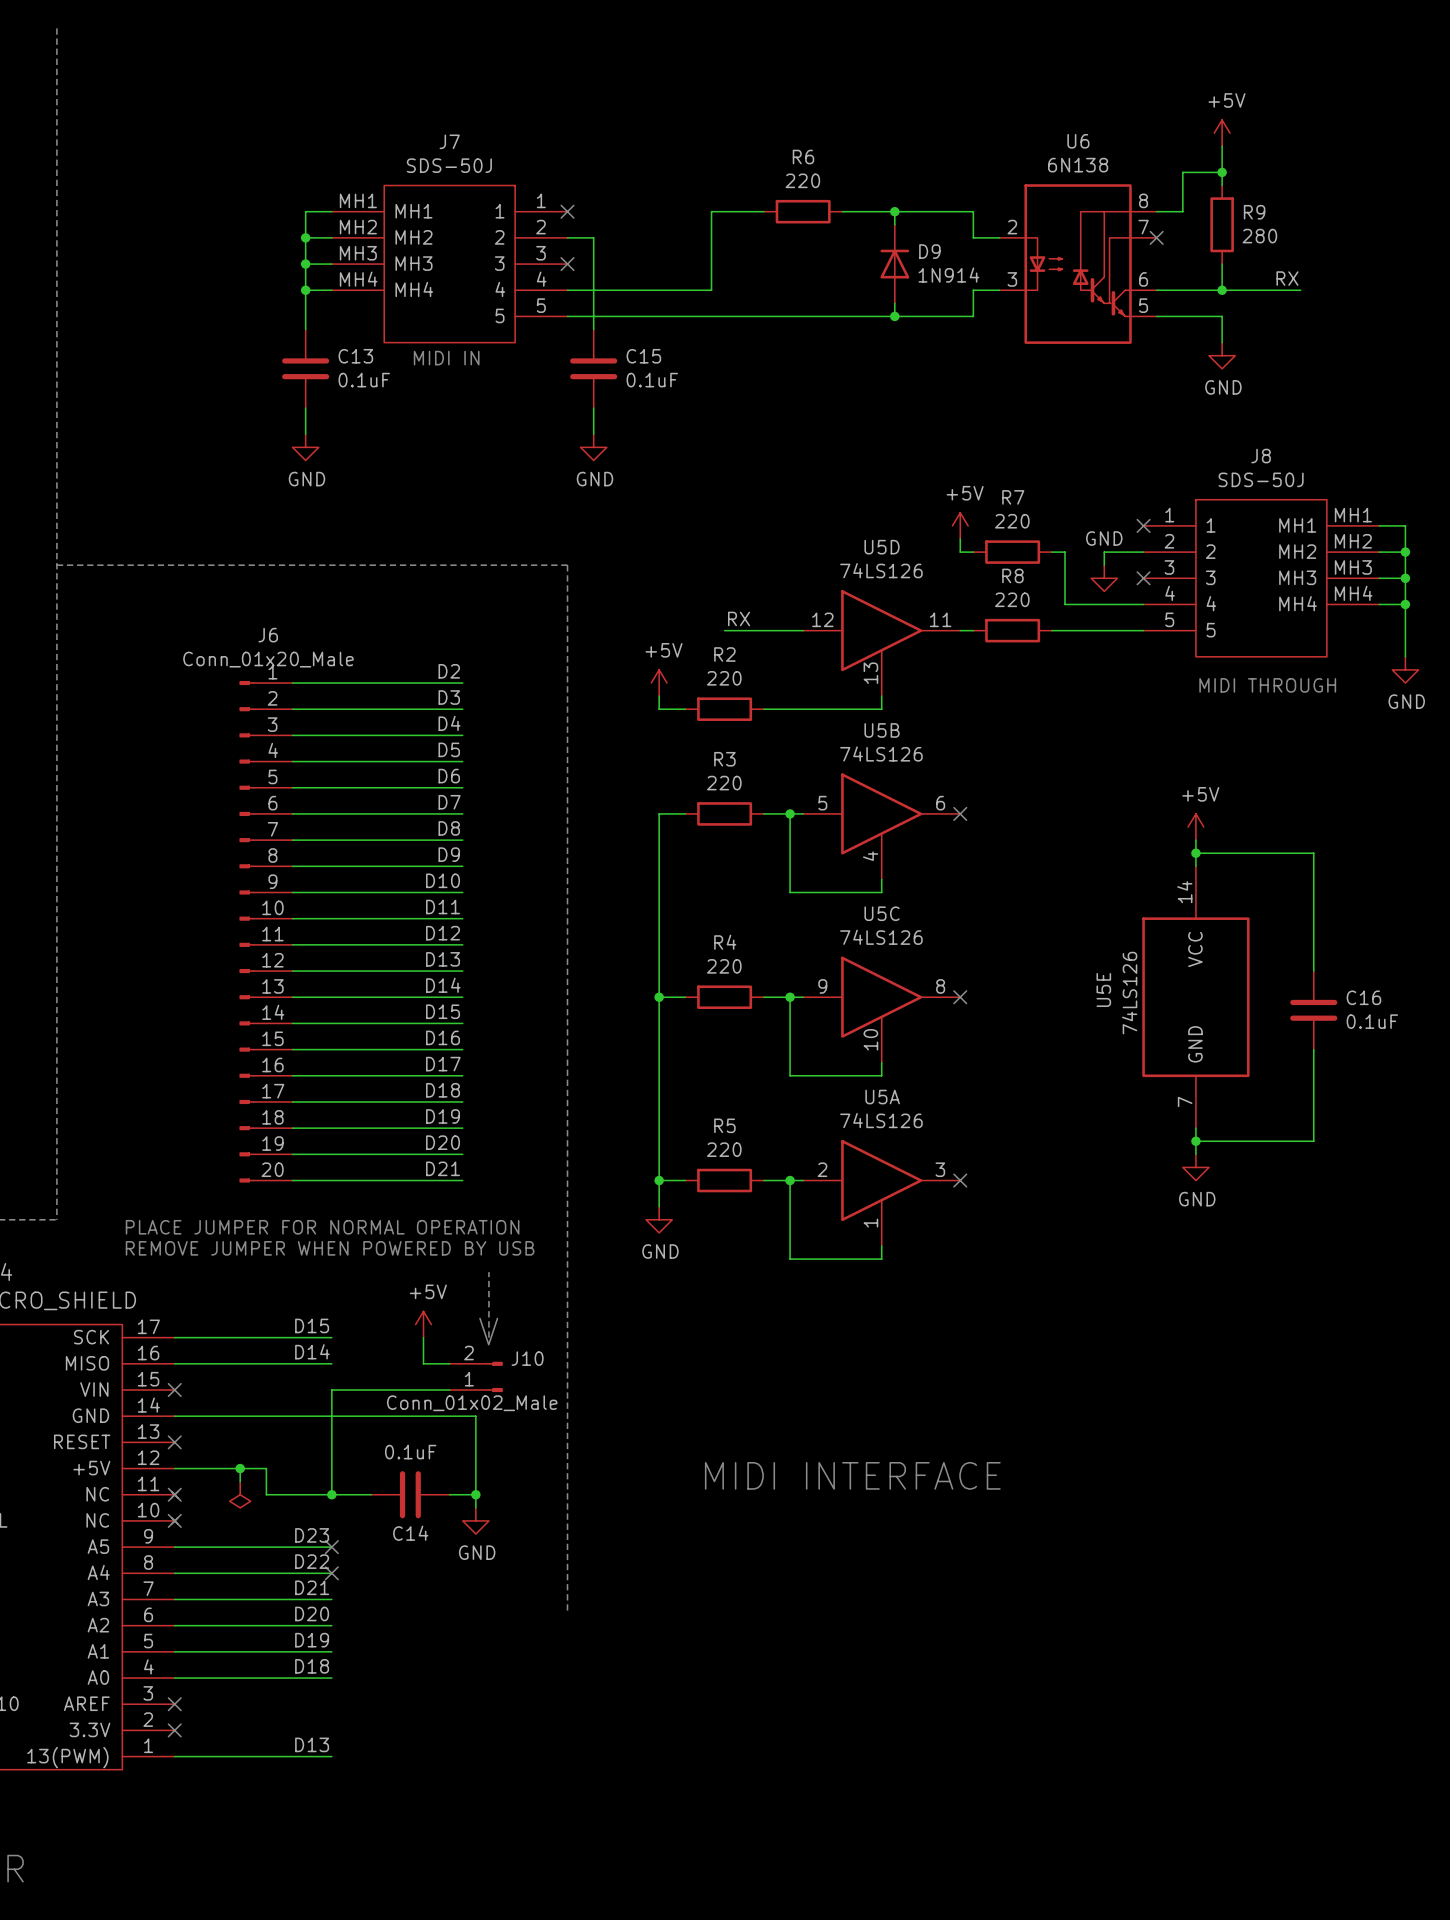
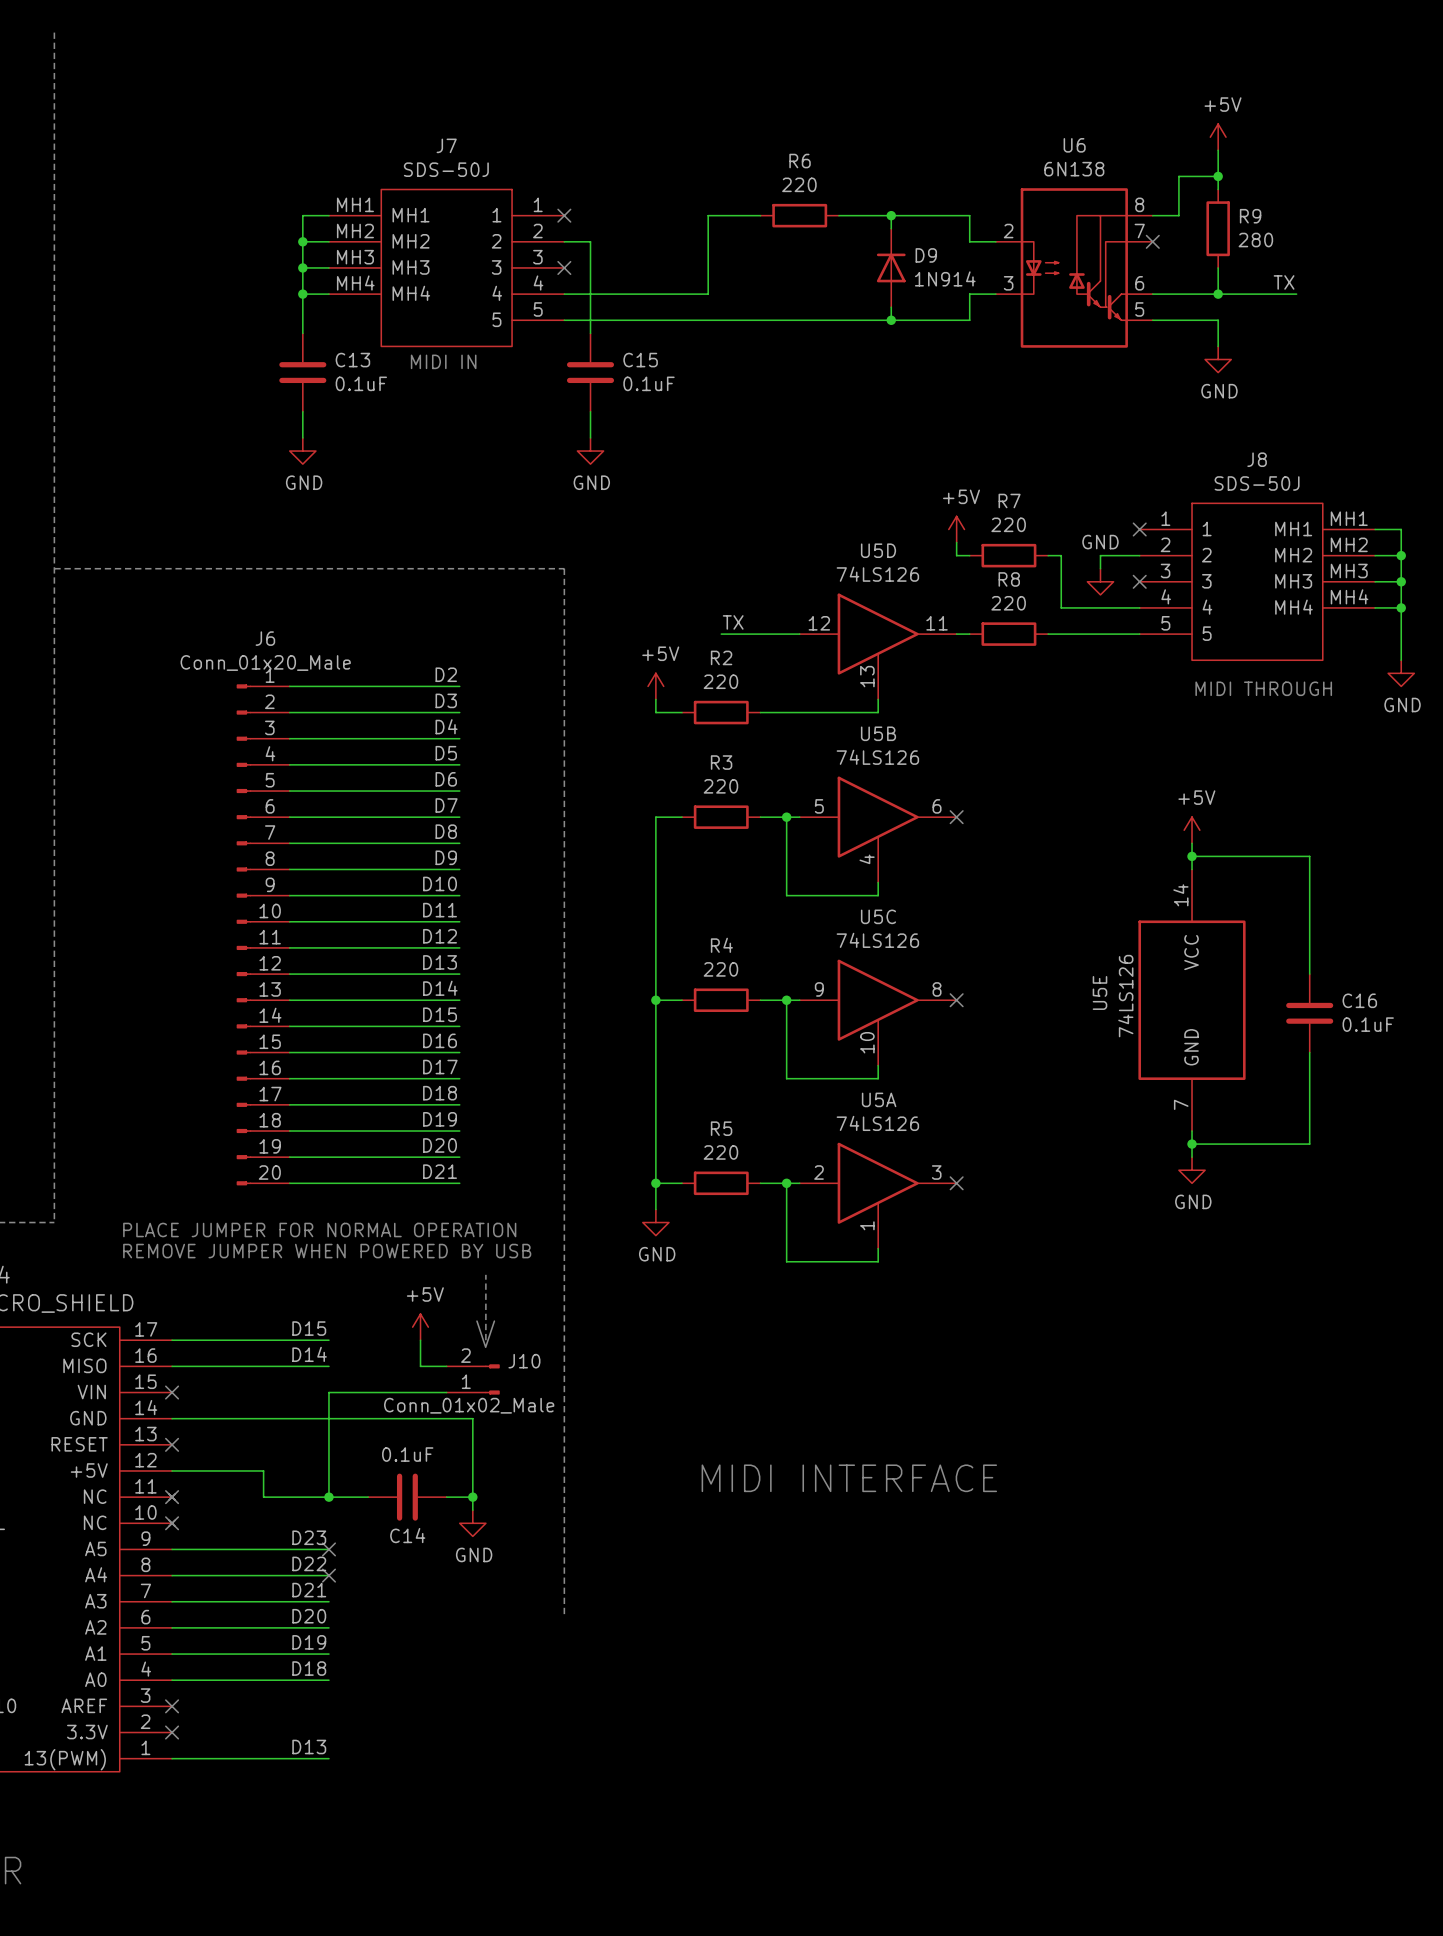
label: RX (1287, 278) -> TX (1284, 282)
label: RX (739, 618) -> TX (733, 622)
wire: (240, 1468) (240, 1481) -> none
junction: (240, 1468) -> none
power symbol: (240, 1494) -> none

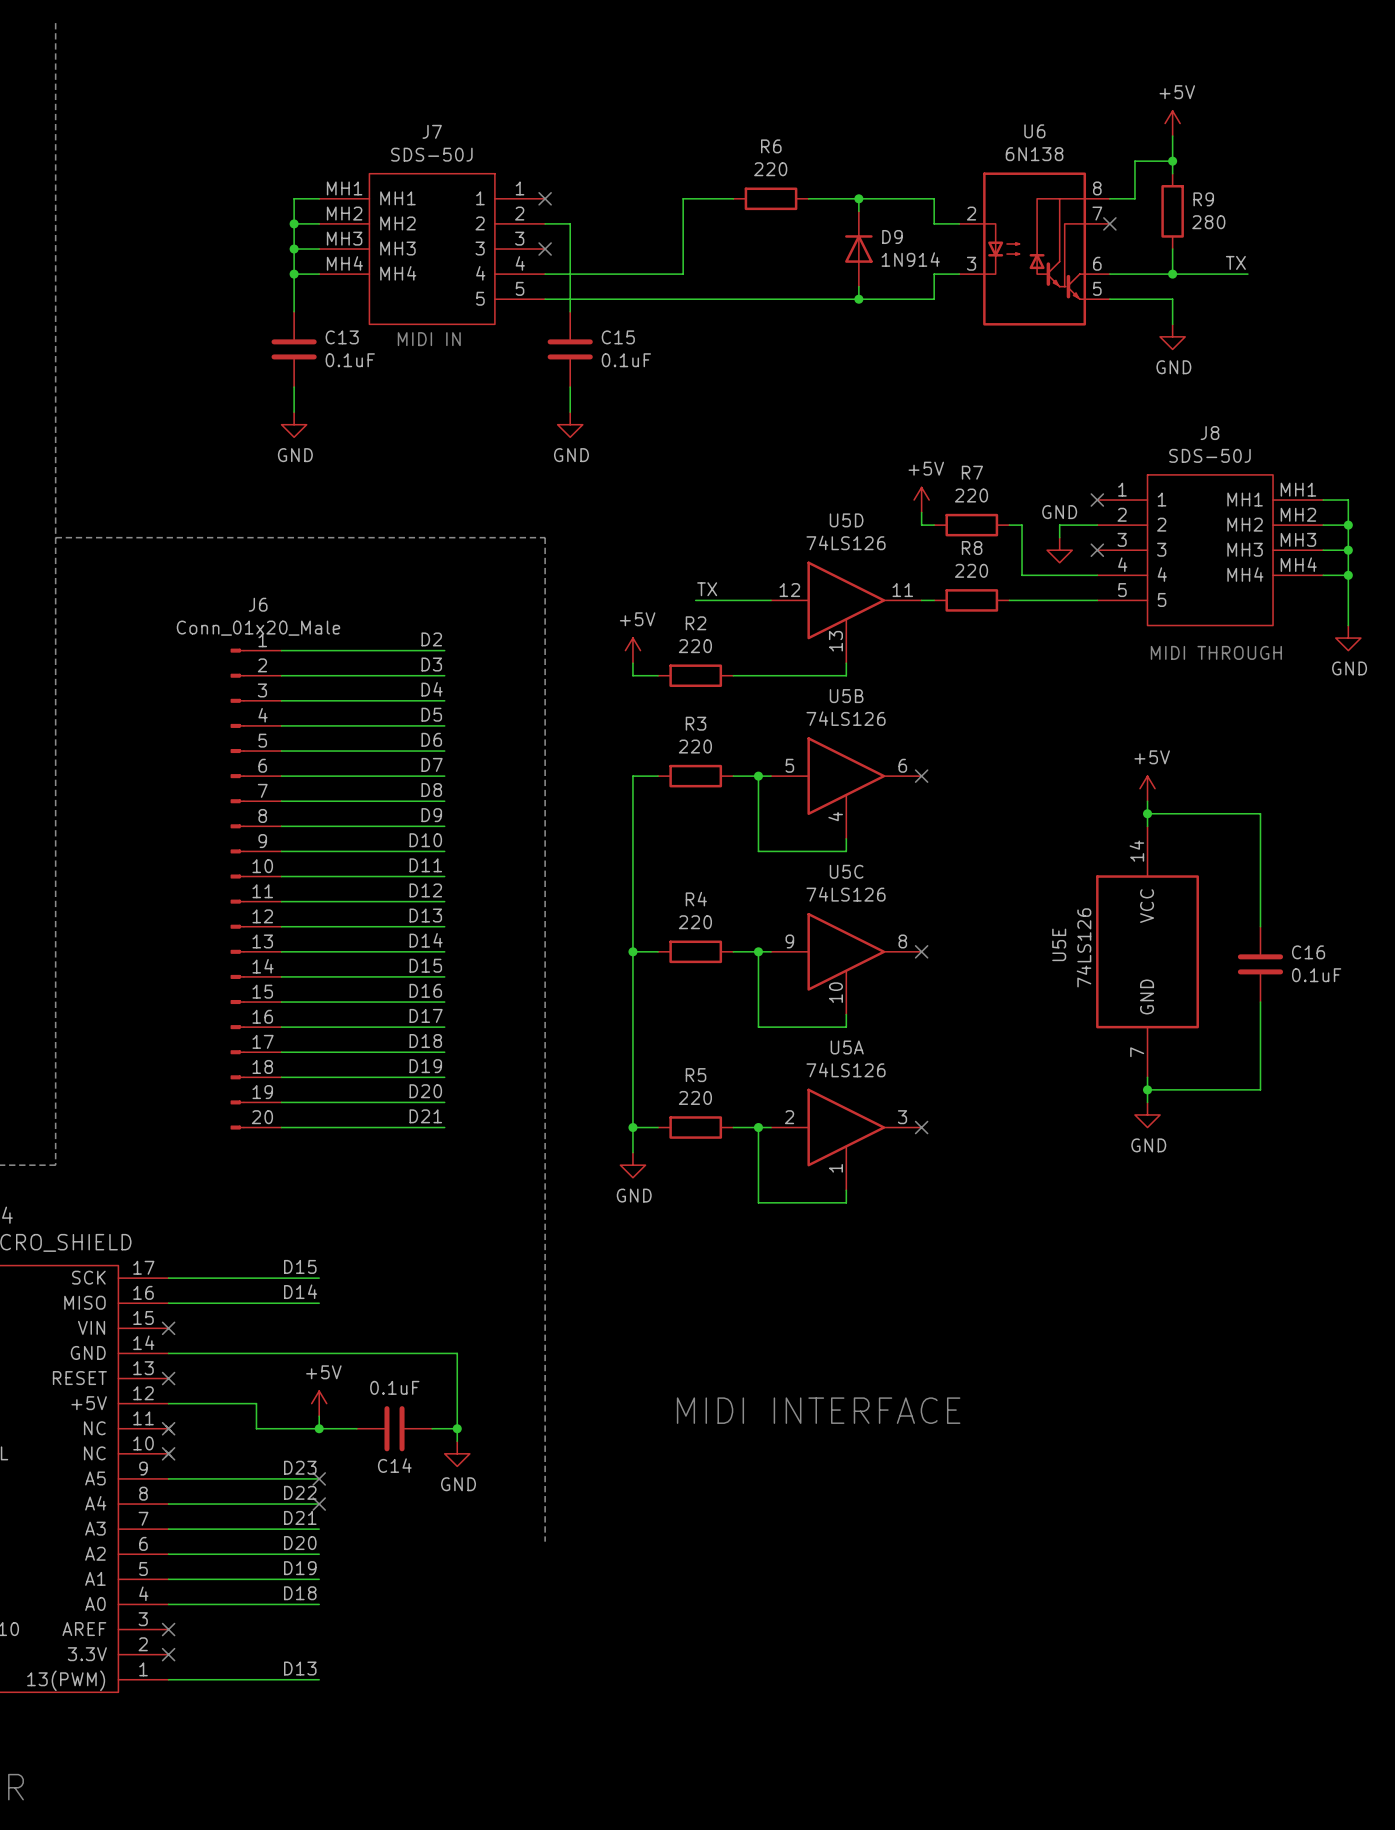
text: PLACE JUMPER FOR NORMAL OPERATION (319, 1230) -> none
text: REMOVE JUMPER WHEN POWERED BY USB (327, 1251) -> none
line: (485, 1274) (485, 1340) -> none
power symbol position: +5V (420, 1327) -> +5V (319, 1403)
text: V (485, 1334) -> none
wire: (420, 1340) (420, 1366) (446, 1366) -> none
J10: Conn_01x02_Male (473, 1379) -> none
wire: (446, 1392) (328, 1392) (328, 1484) -> none

